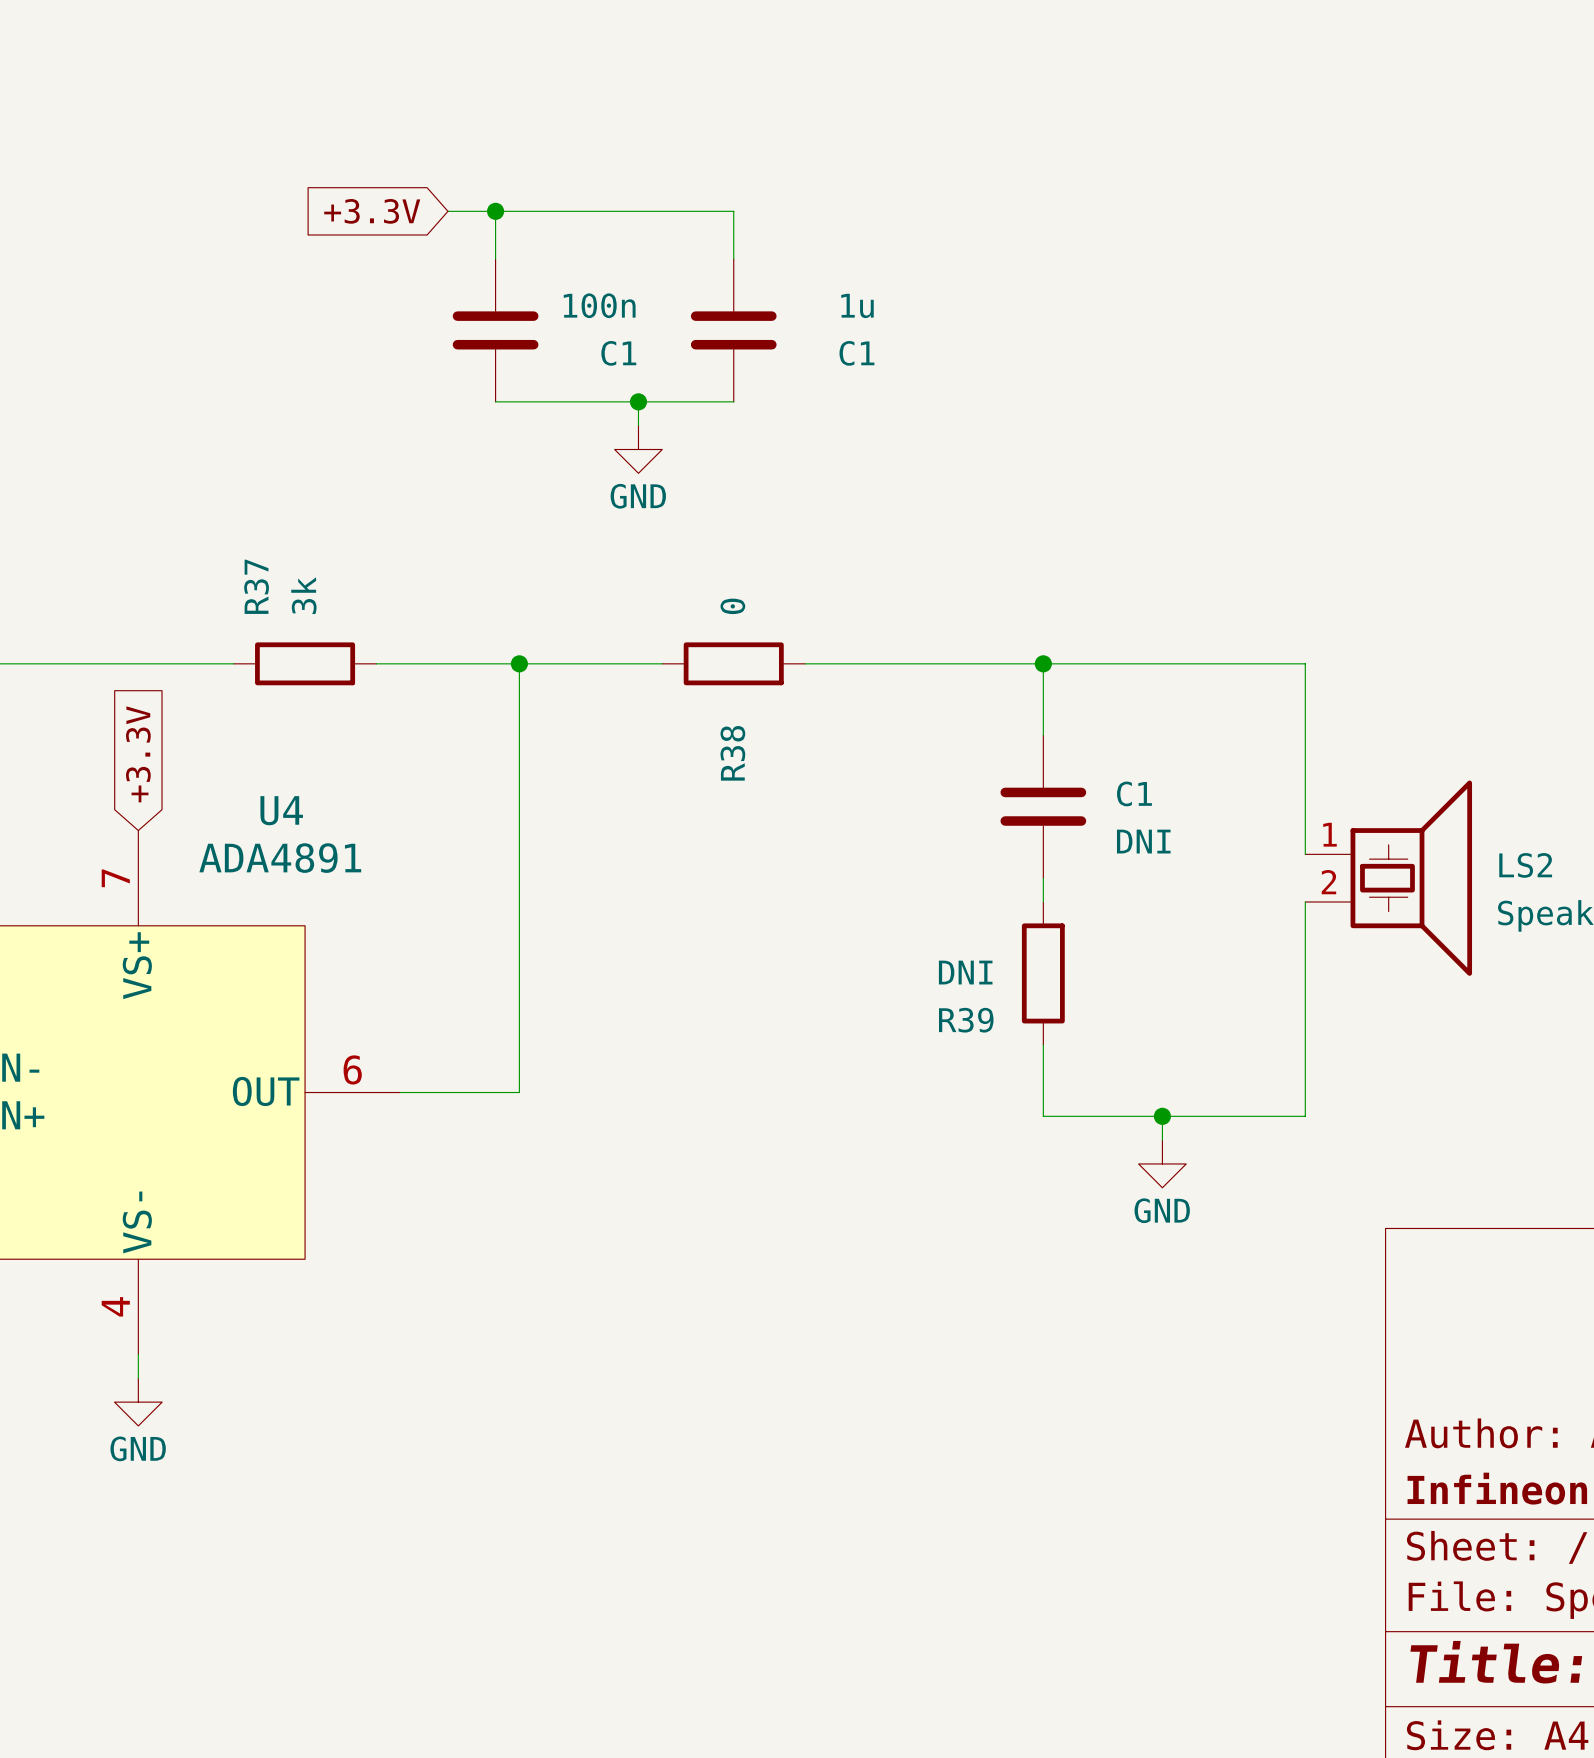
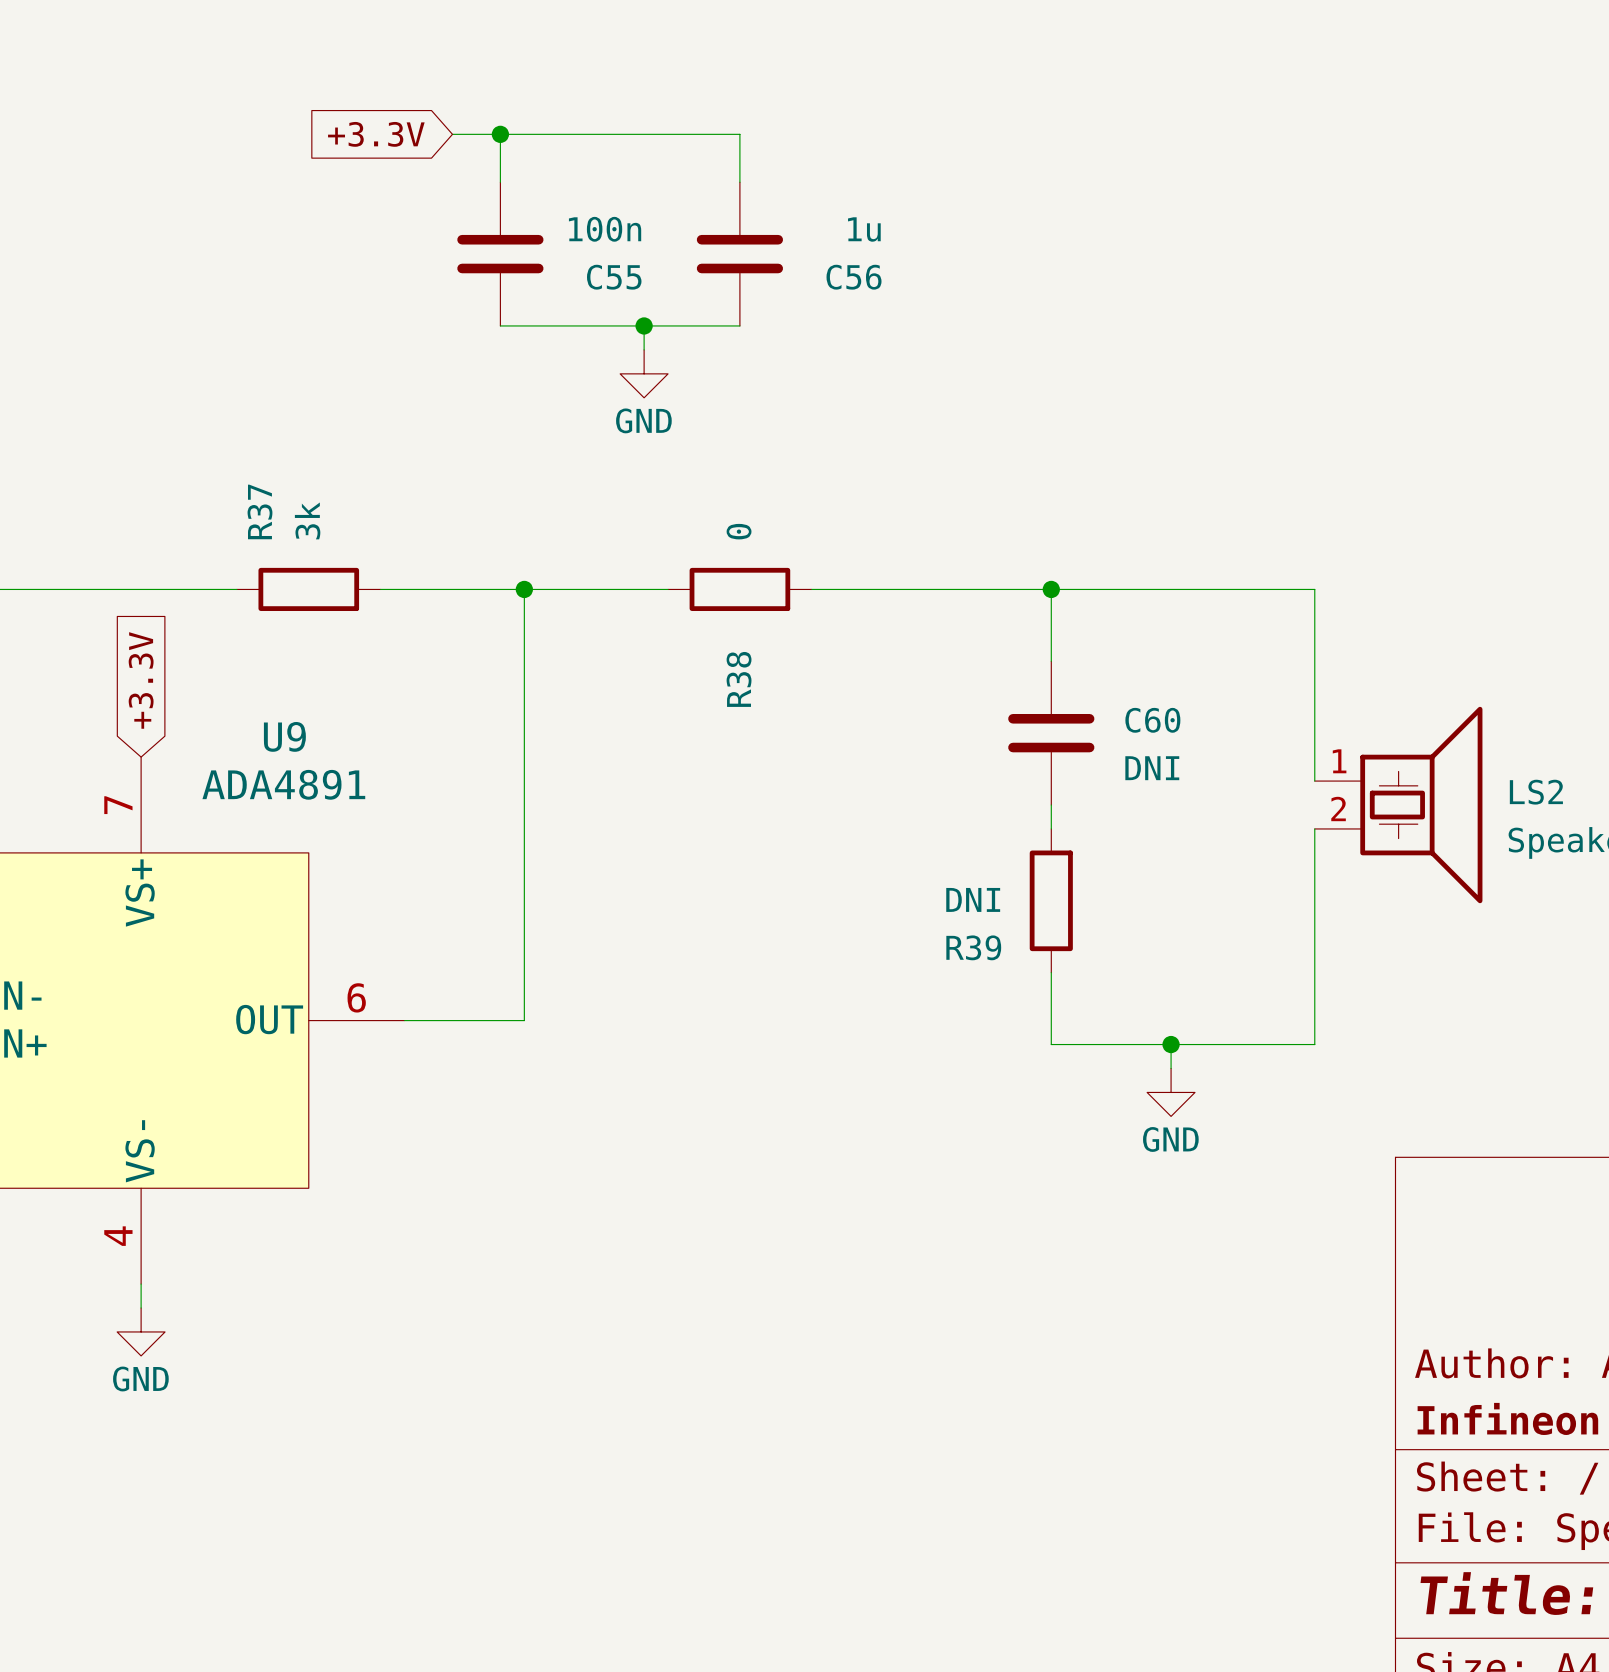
C1 name: C1 (618, 353) -> C55 (614, 277)
C1 name: C1 (856, 353) -> C56 (854, 277)
C1 name: C1 (1134, 793) -> C60 (1152, 720)
U4 name: U4 (281, 810) -> U9 (284, 736)

